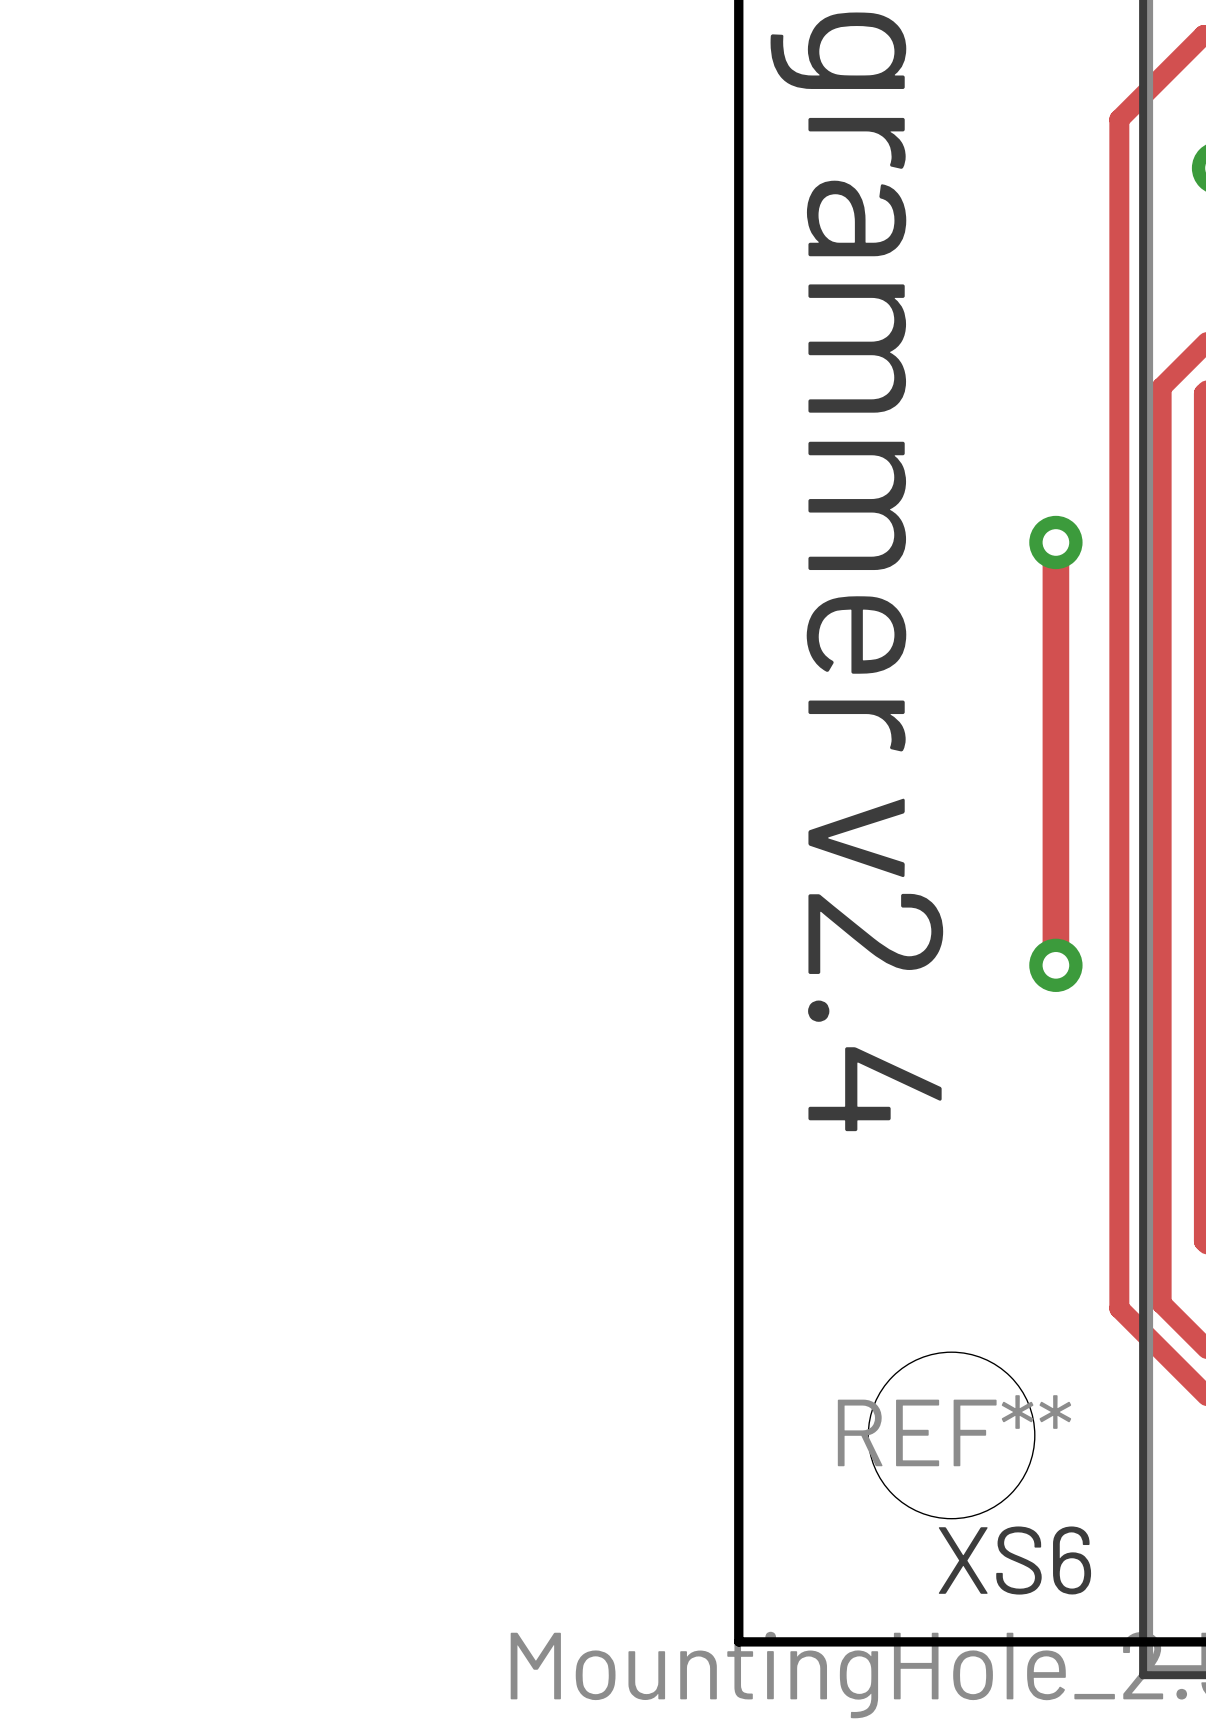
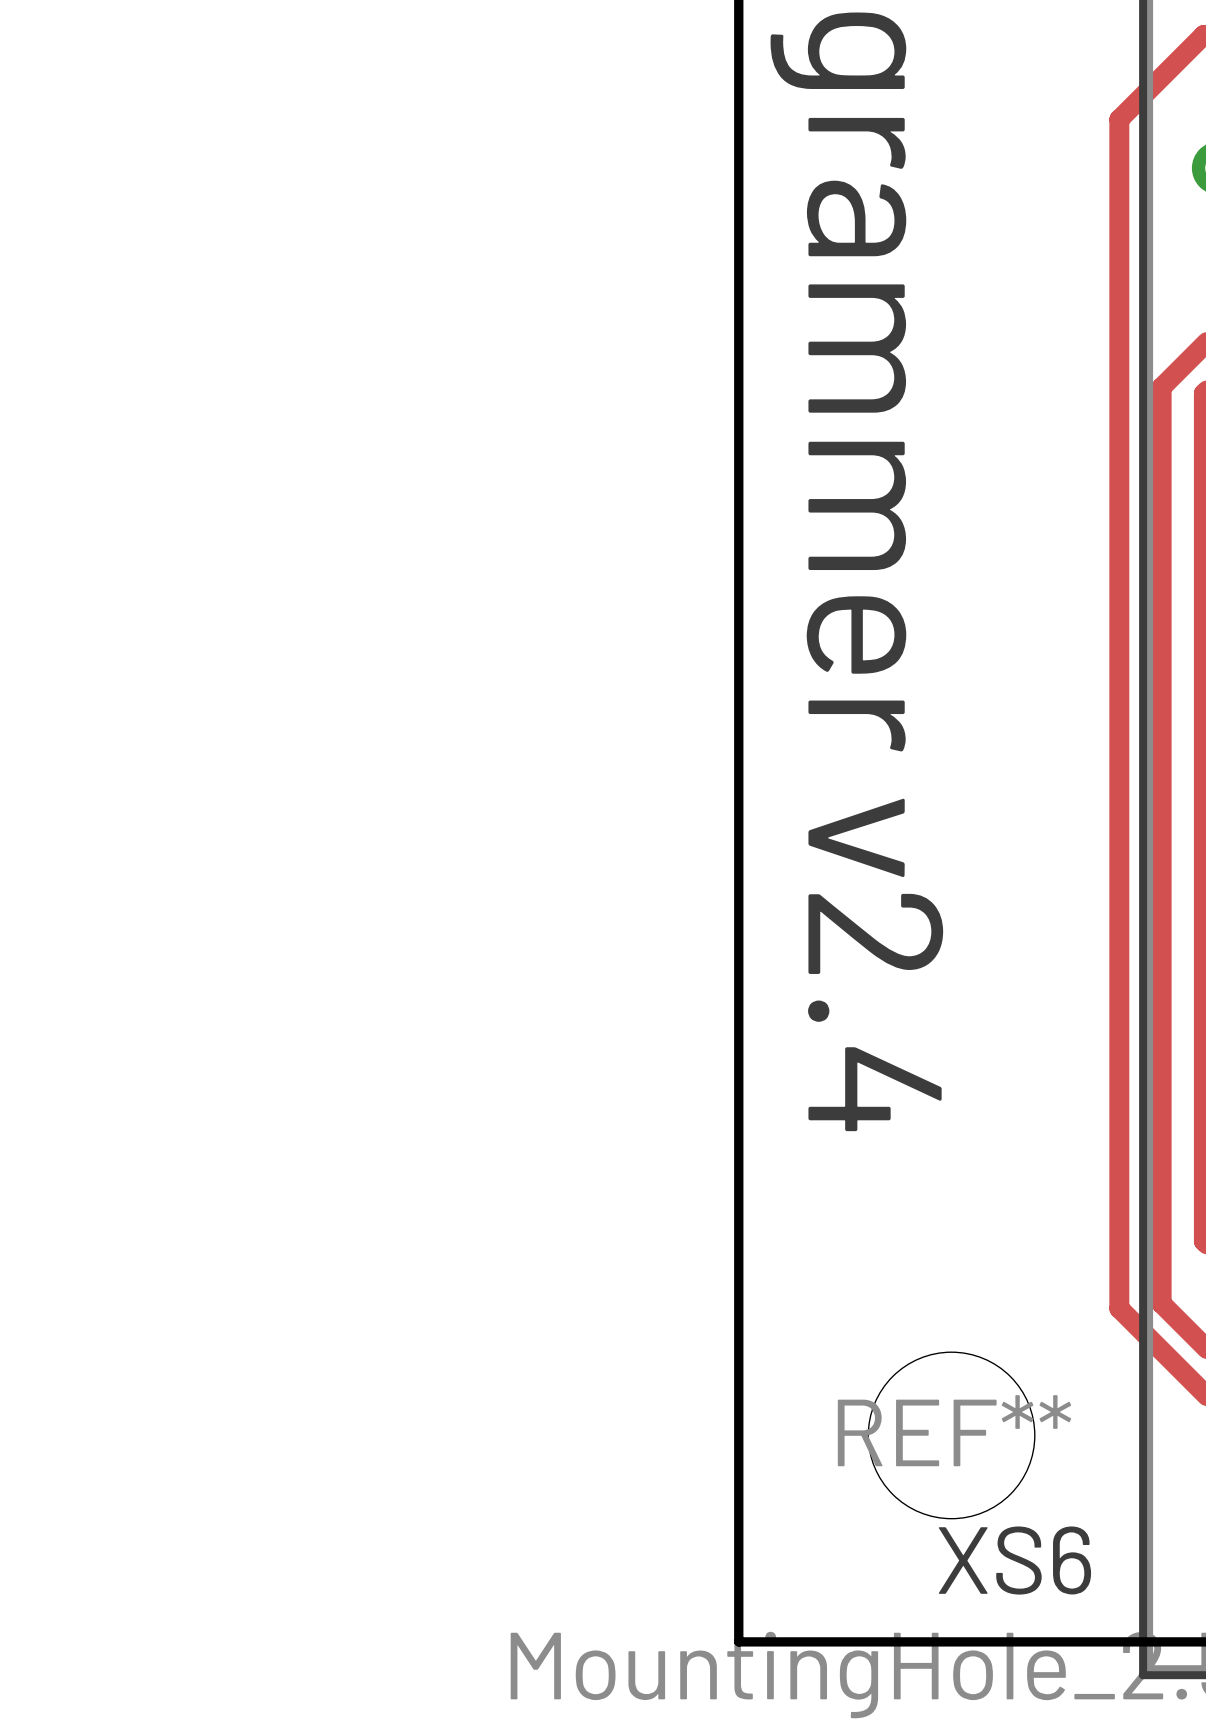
track: (1055, 542) (1055, 965) -> none
via: (1055, 542) -> none
via: (1055, 965) -> none

